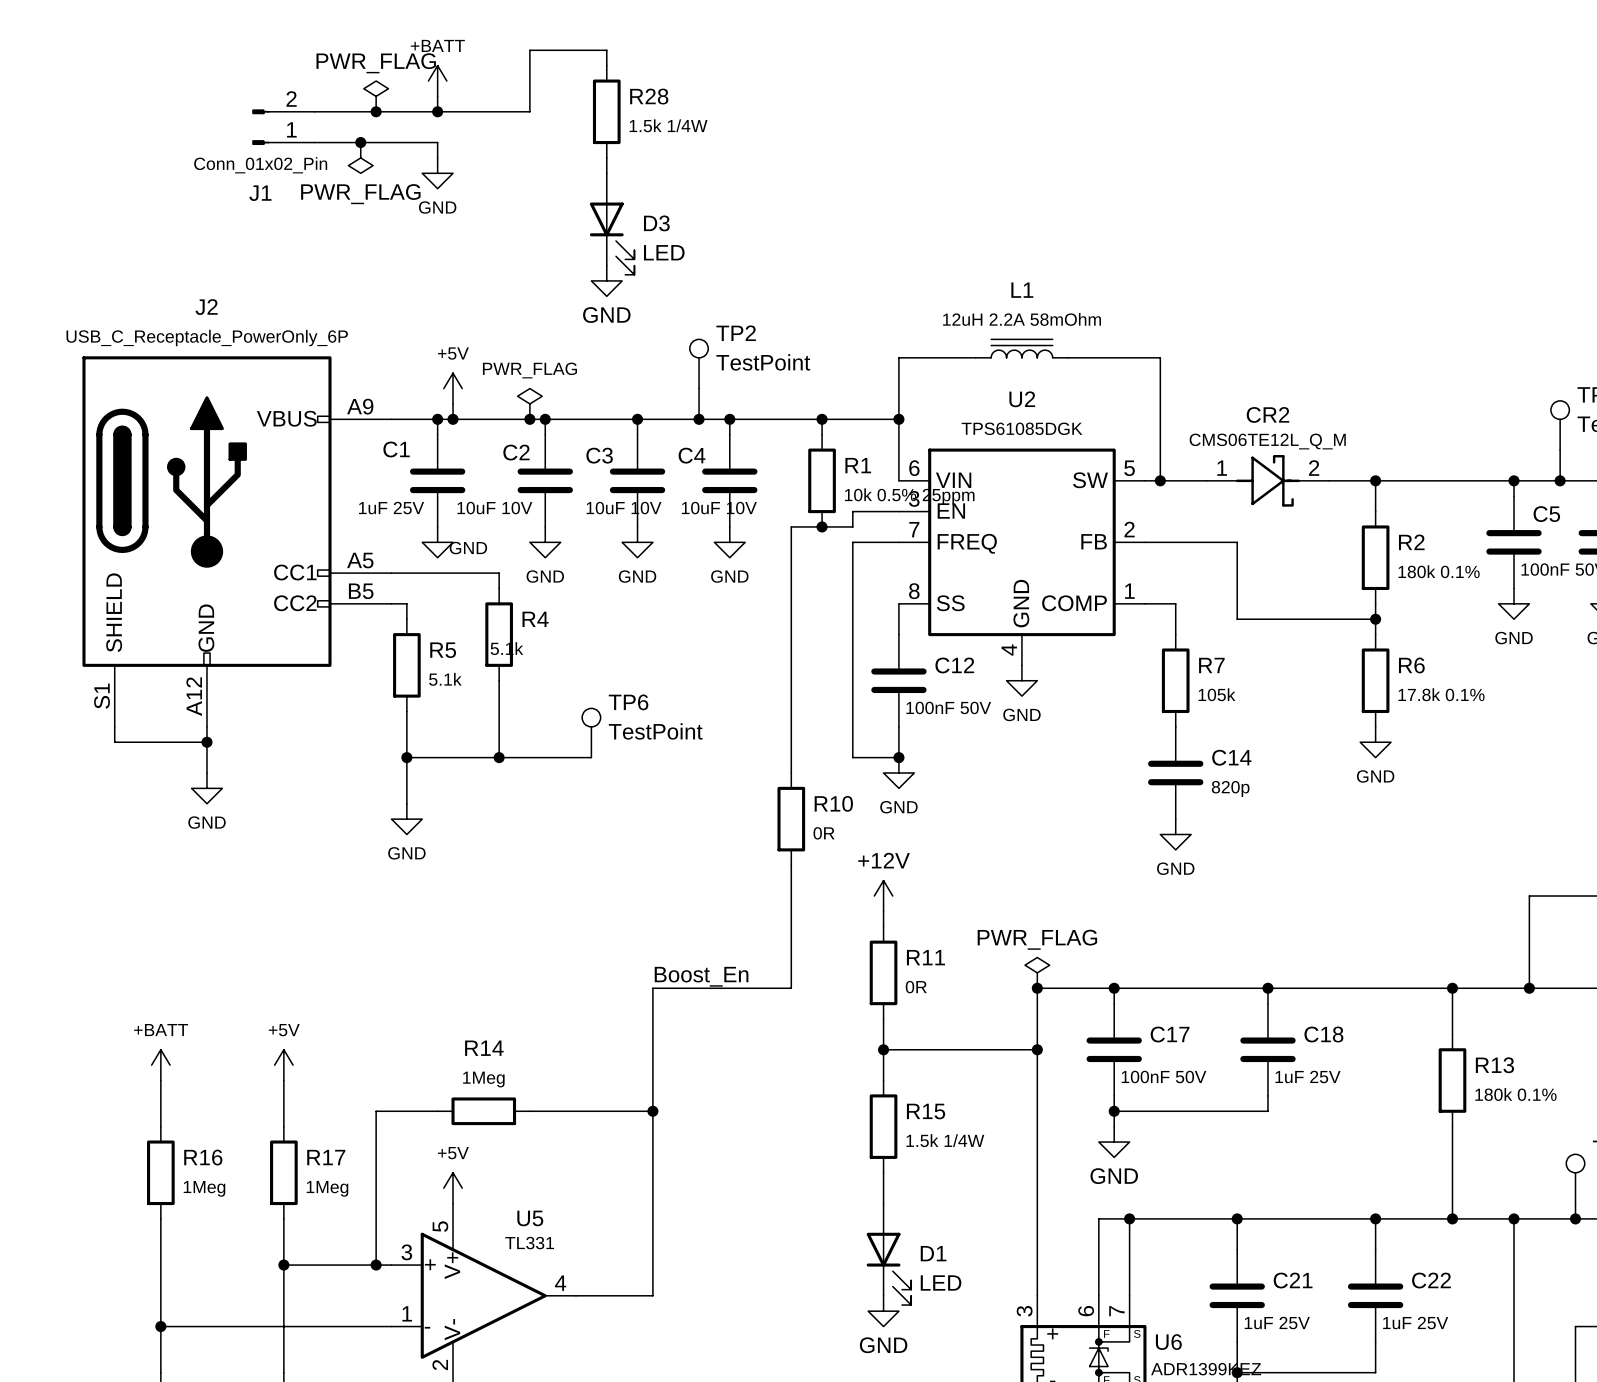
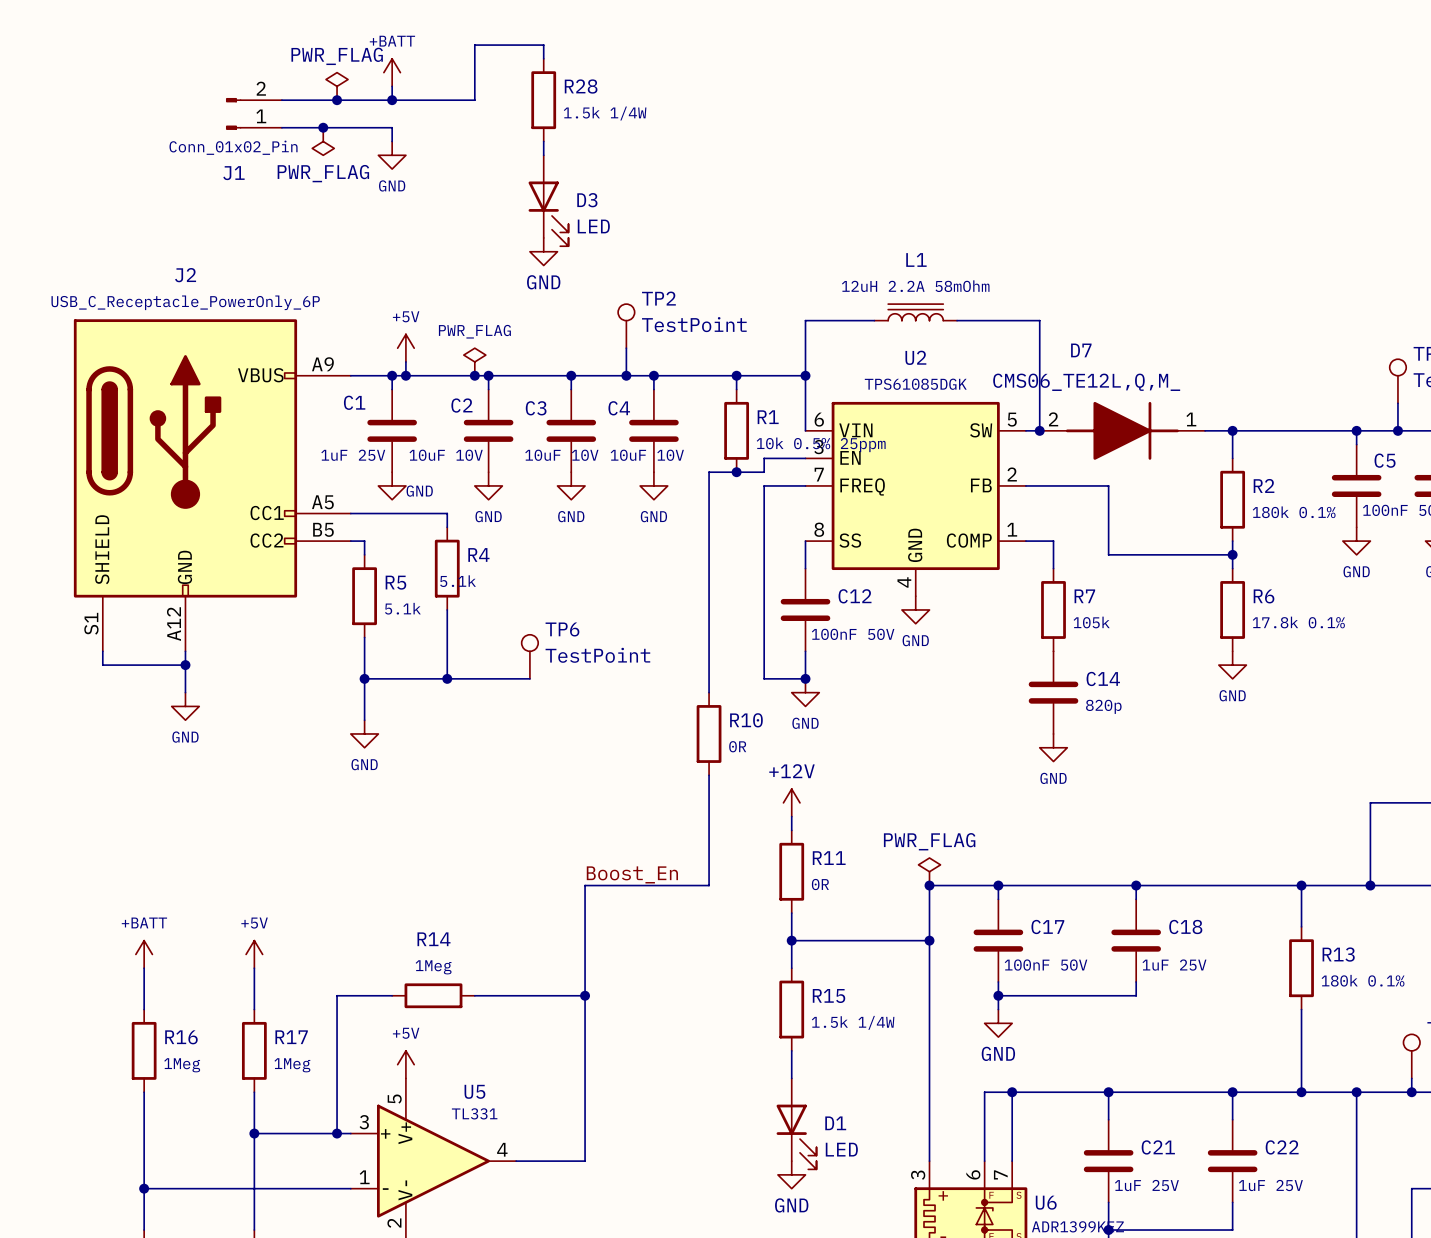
D7: none -> CMS06_TE12L,Q,M_ (1122, 430)
CR2: CMS06TE12L_Q_M (1267, 480) -> none

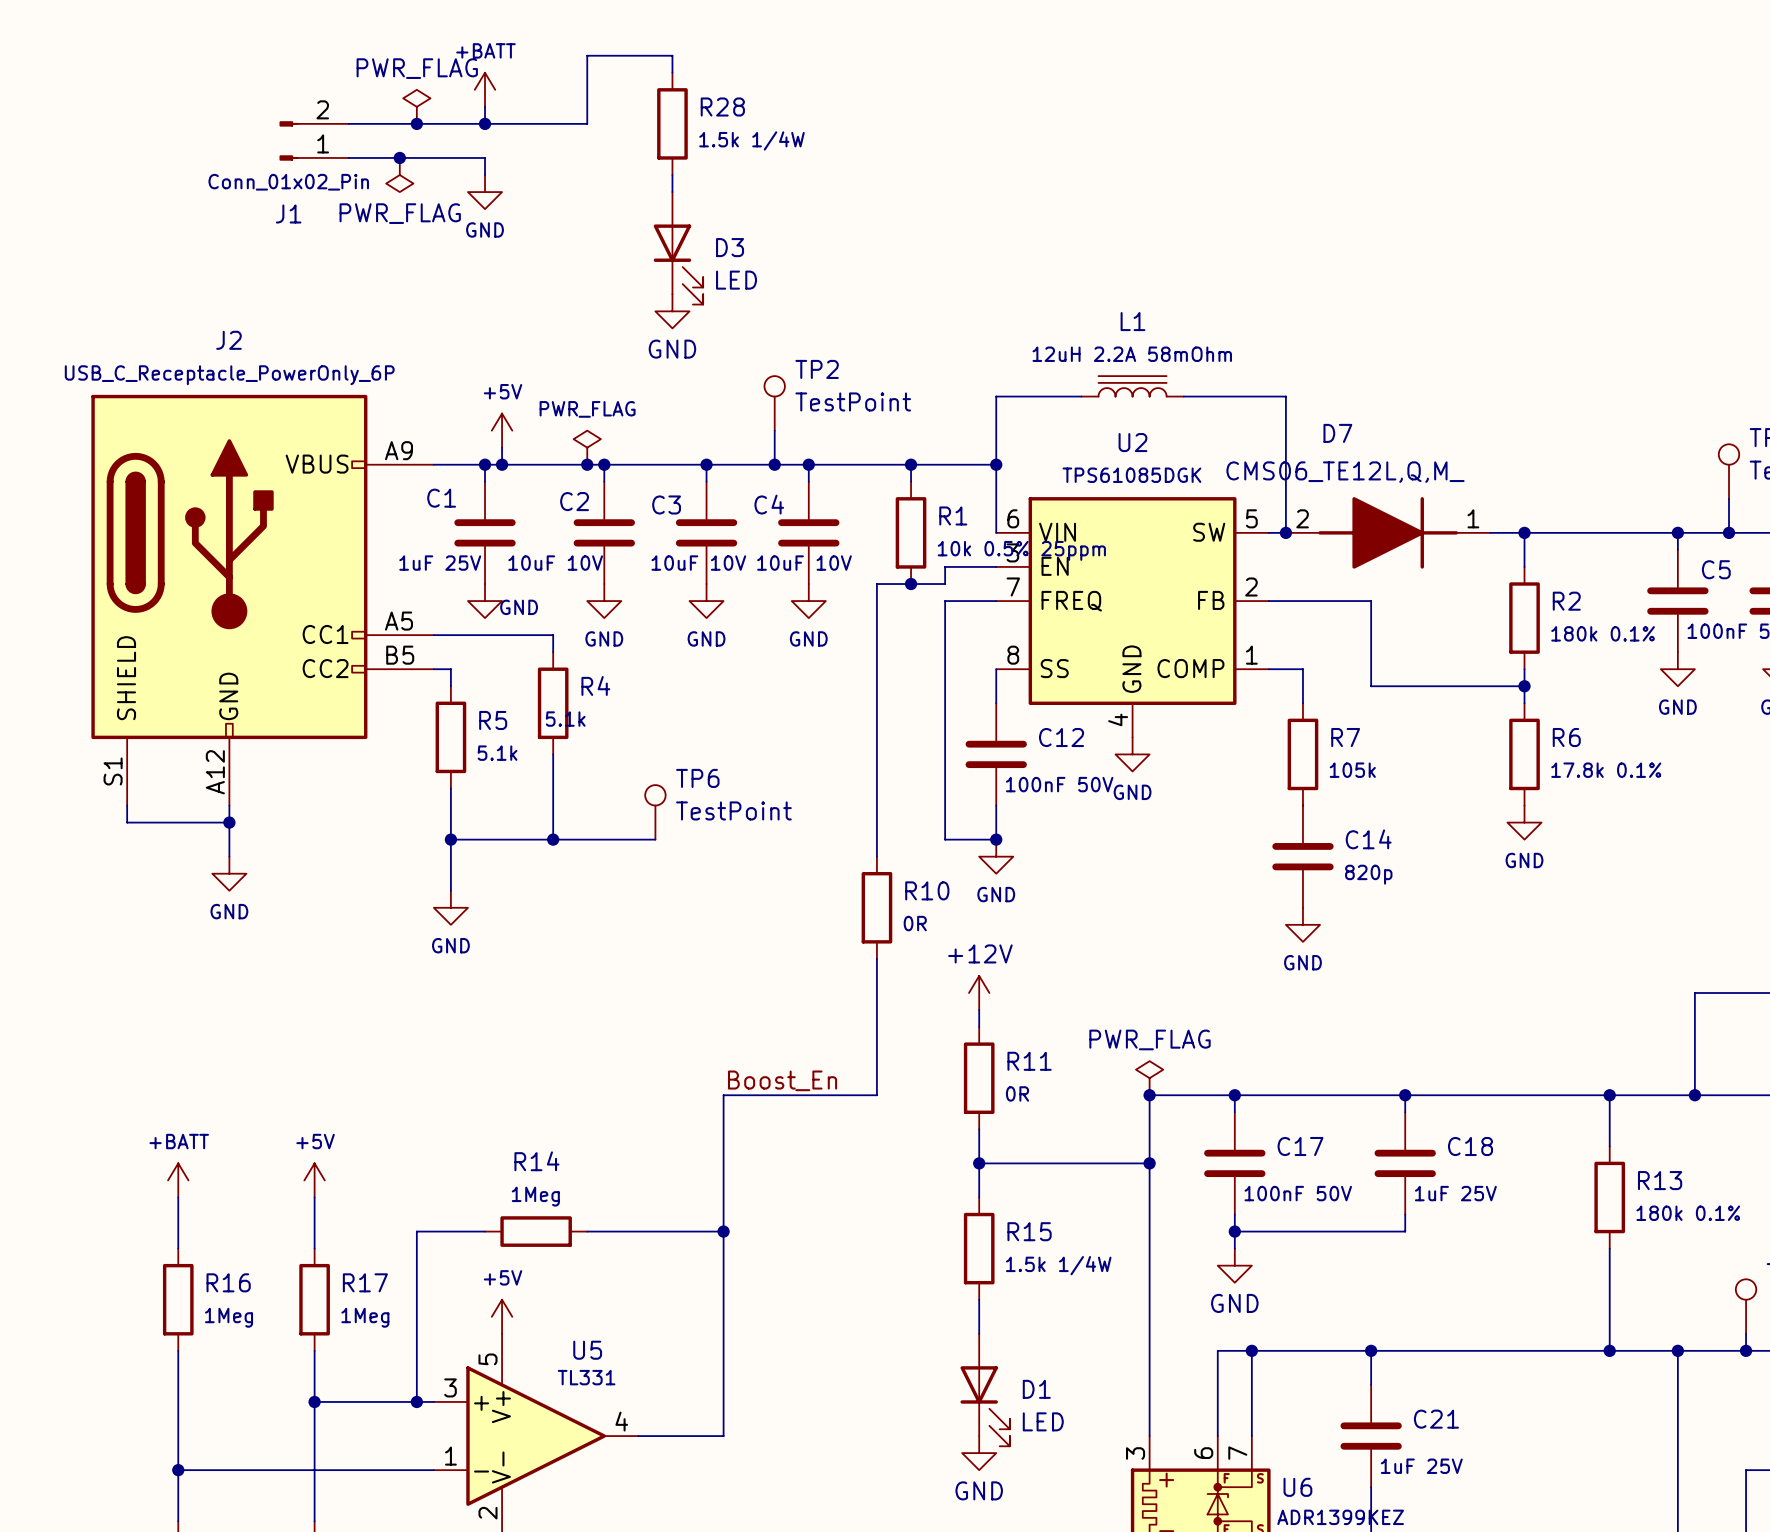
wire: (1232, 1092) (1232, 1119) -> none
junction: (1232, 1092) -> none
C22: 1uF 25V (1232, 1161) -> none
wire: (1232, 1202) (1232, 1230) (1108, 1230) -> none
junction: (1108, 1230) -> none

